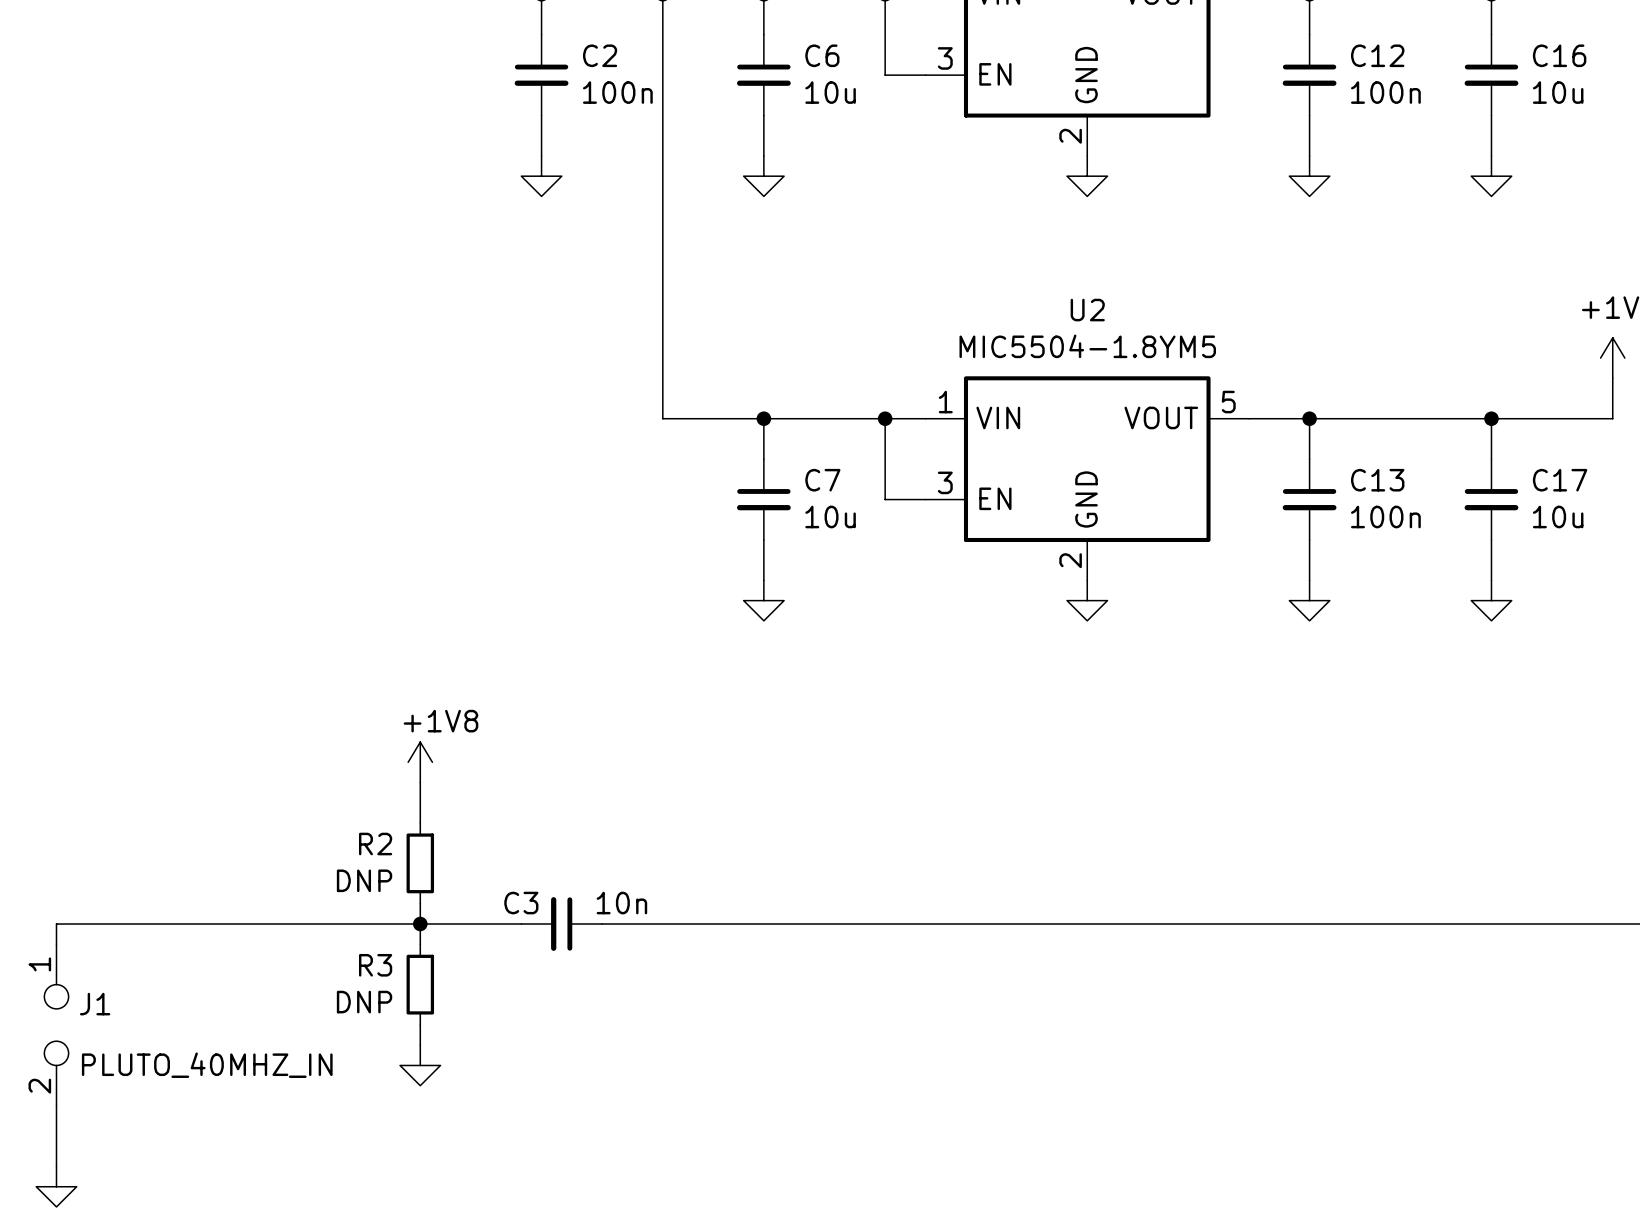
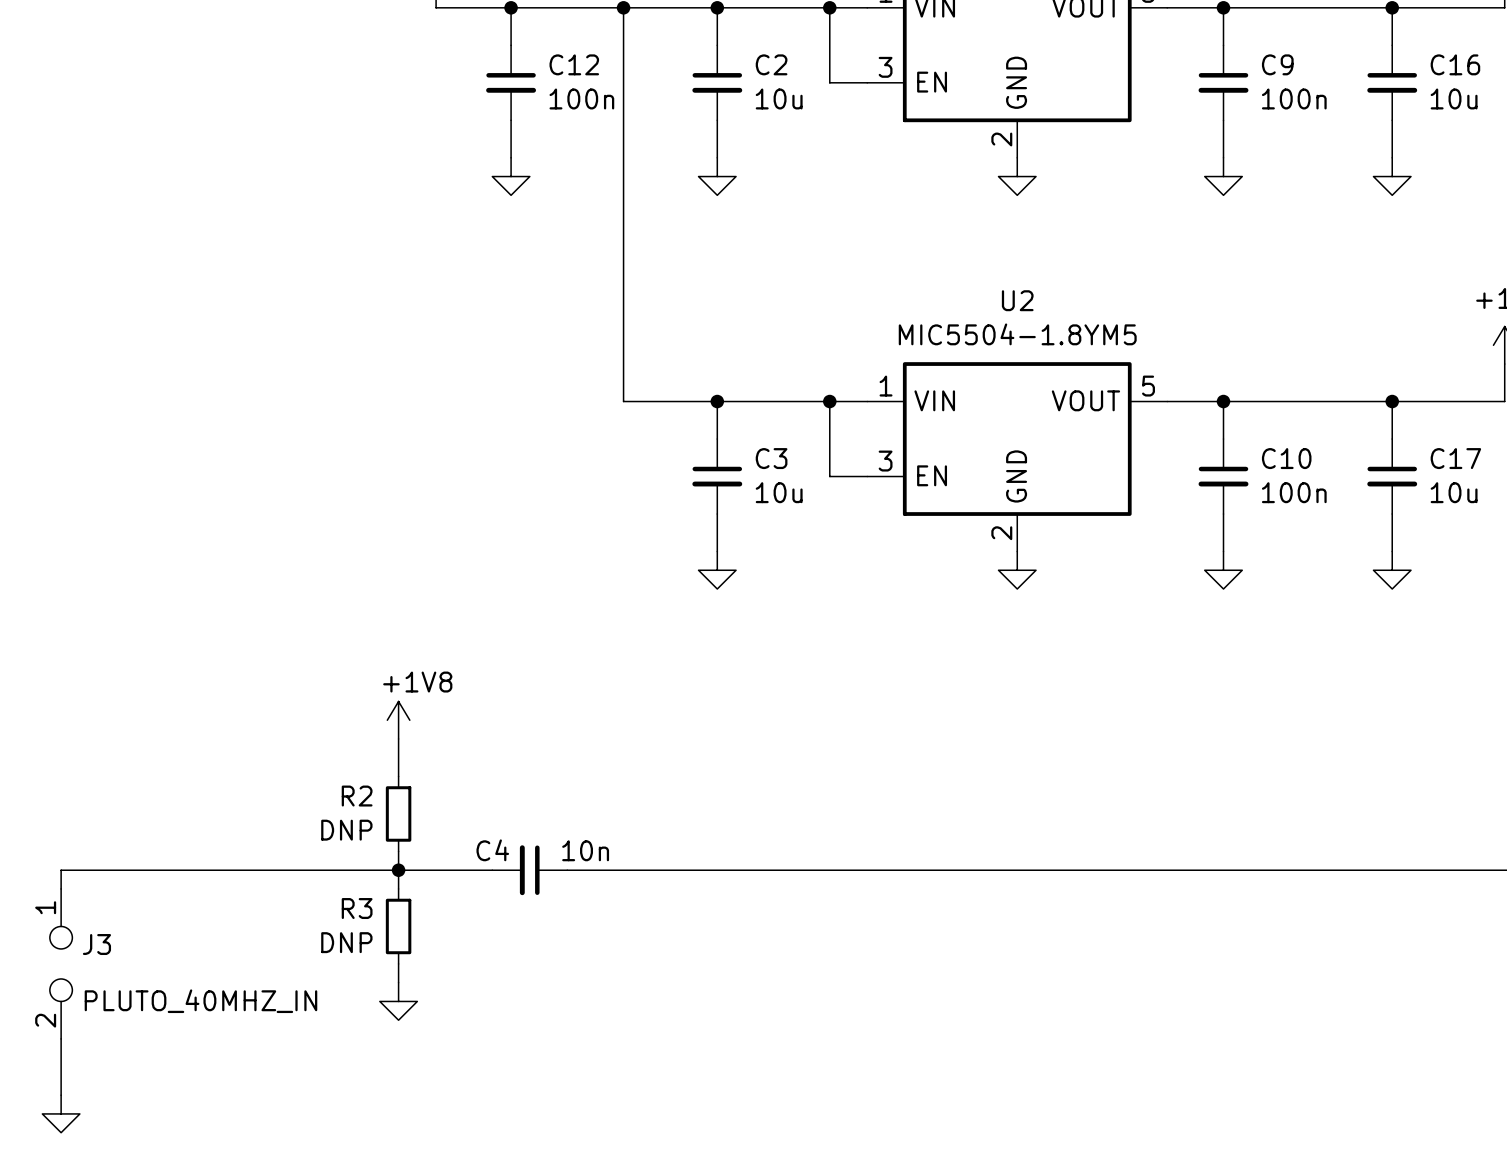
C2 name: C2 (600, 55) -> C12 (574, 64)
C6 name: C6 (822, 55) -> C2 (771, 64)
C12 name: C12 (1377, 55) -> C9 (1277, 64)
C7 name: C7 (822, 480) -> C3 (771, 458)
C13 name: C13 (1377, 480) -> C10 (1286, 458)
C3 name: C3 (521, 903) -> C4 (492, 850)
J1 name: J1 (95, 1004) -> J3 (96, 944)

